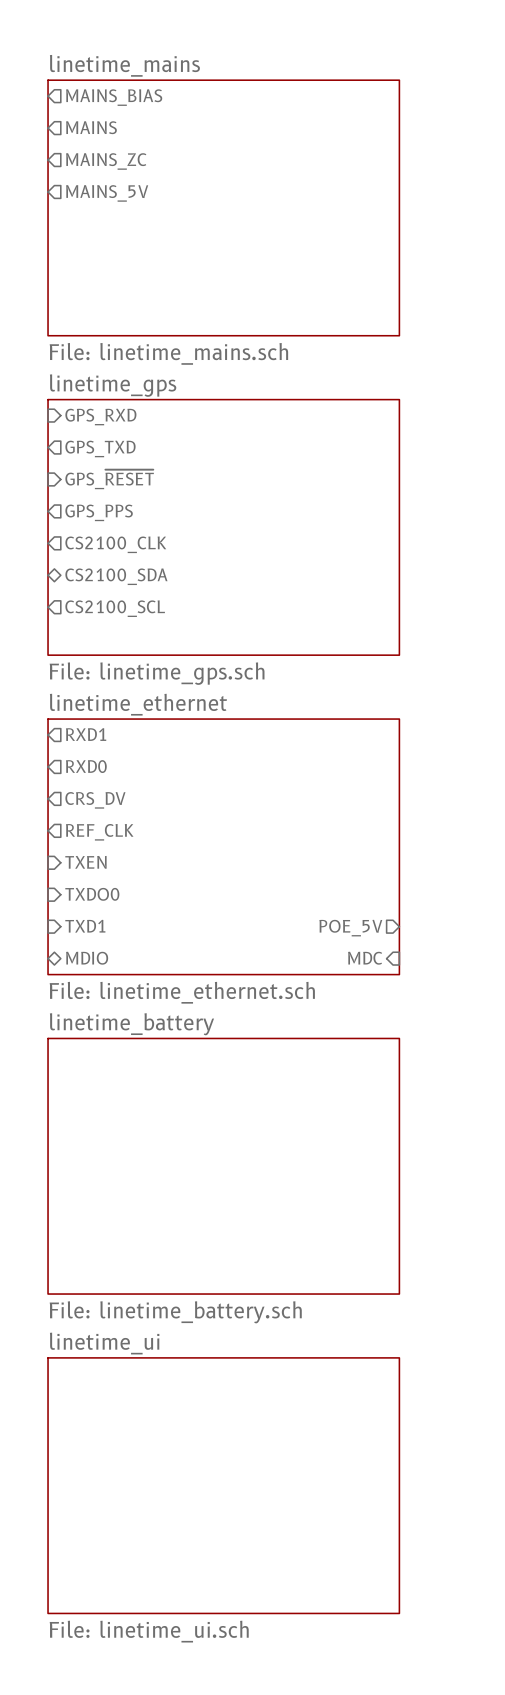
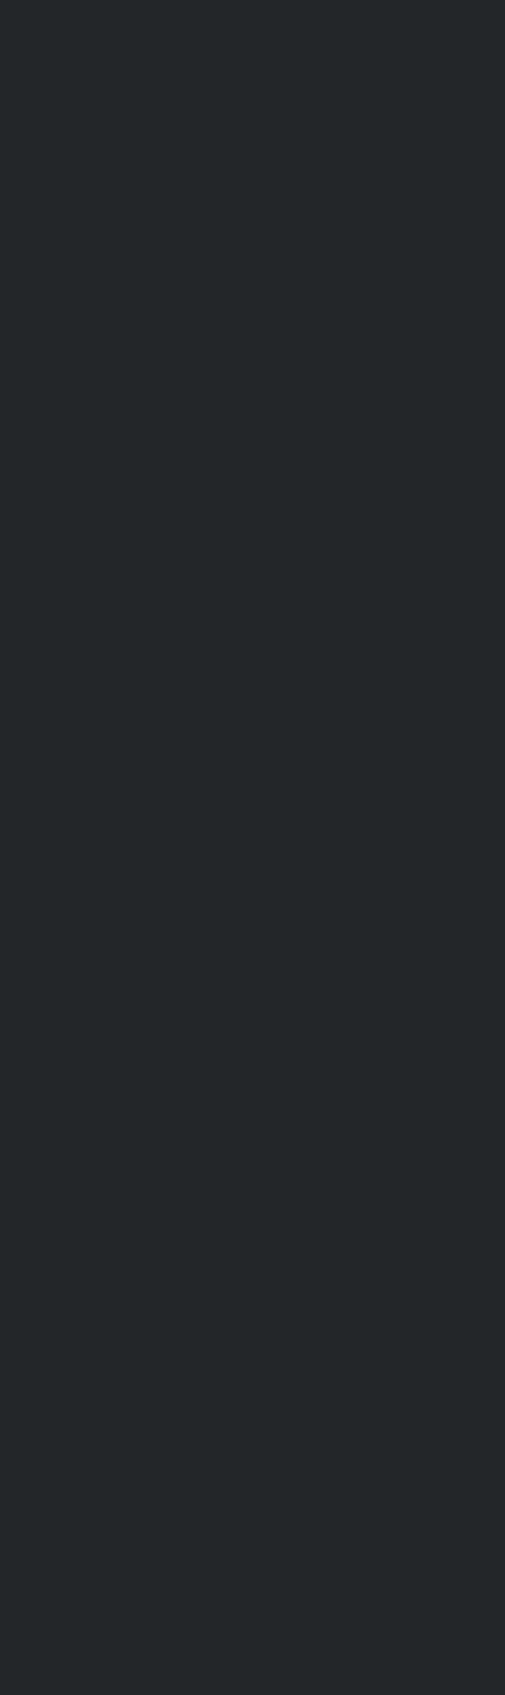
sheet pin: MAINS_BIAS (114, 97) -> none
sheet pin: MAINS (91, 127) -> none
sheet pin: MAINS_ZC (106, 161) -> none
sheet pin: MAINS_5V (107, 193) -> none
sheet linetime_mains: File: linetime_mains.sch (223, 207) -> none
sheet pin: GPS_RXD (100, 417) -> none
sheet pin: GPS_TXD (100, 448) -> none
sheet pin: GPS_~{RESET} (109, 479) -> none
sheet pin: GPS_PPS (99, 512) -> none
sheet linetime_gps: File: linetime_gps.sch (223, 527) -> none
sheet pin: CS2100_CLK (115, 544) -> none
sheet pin: CS2100_SDA (116, 576) -> none
sheet pin: CS2100_SCL (115, 608) -> none
sheet pin: RXD1 (86, 734) -> none
sheet pin: RXD0 (86, 766) -> none
sheet pin: CRS_DV (95, 800) -> none
sheet pin: REF_CLK (99, 832) -> none
sheet linetime_ethernet: File: linetime_ethernet.sch (223, 846) -> none
sheet pin: TXEN (85, 862) -> none
sheet pin: TXDO0 (92, 894) -> none
sheet pin: TXD1 (85, 926) -> none
sheet pin: POE_5V (350, 928) -> none
sheet pin: MDIO (87, 958) -> none
sheet pin: MDC (365, 958) -> none
sheet linetime_battery: File: linetime_battery.sch (223, 1166) -> none
sheet linetime_ui: File: linetime_ui.sch (223, 1485) -> none

